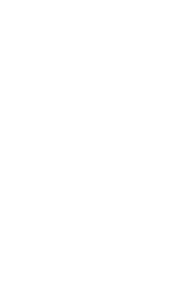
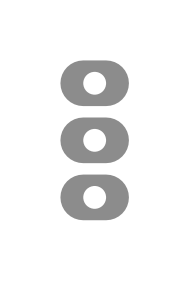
part: none -> (94, 140)

